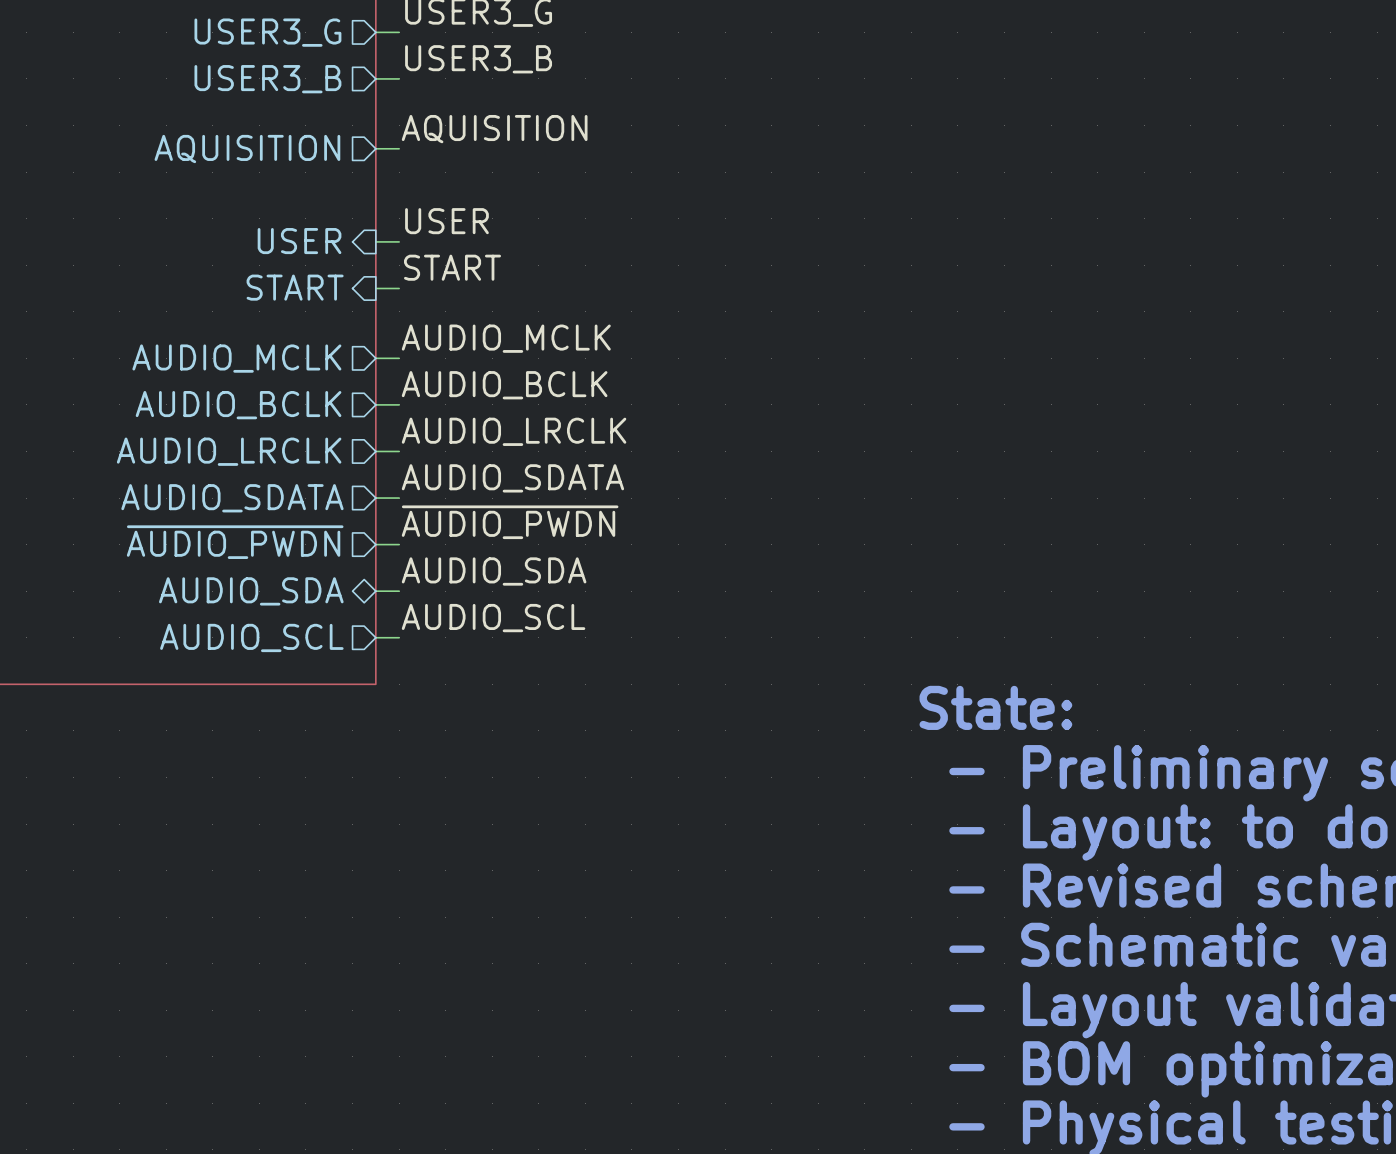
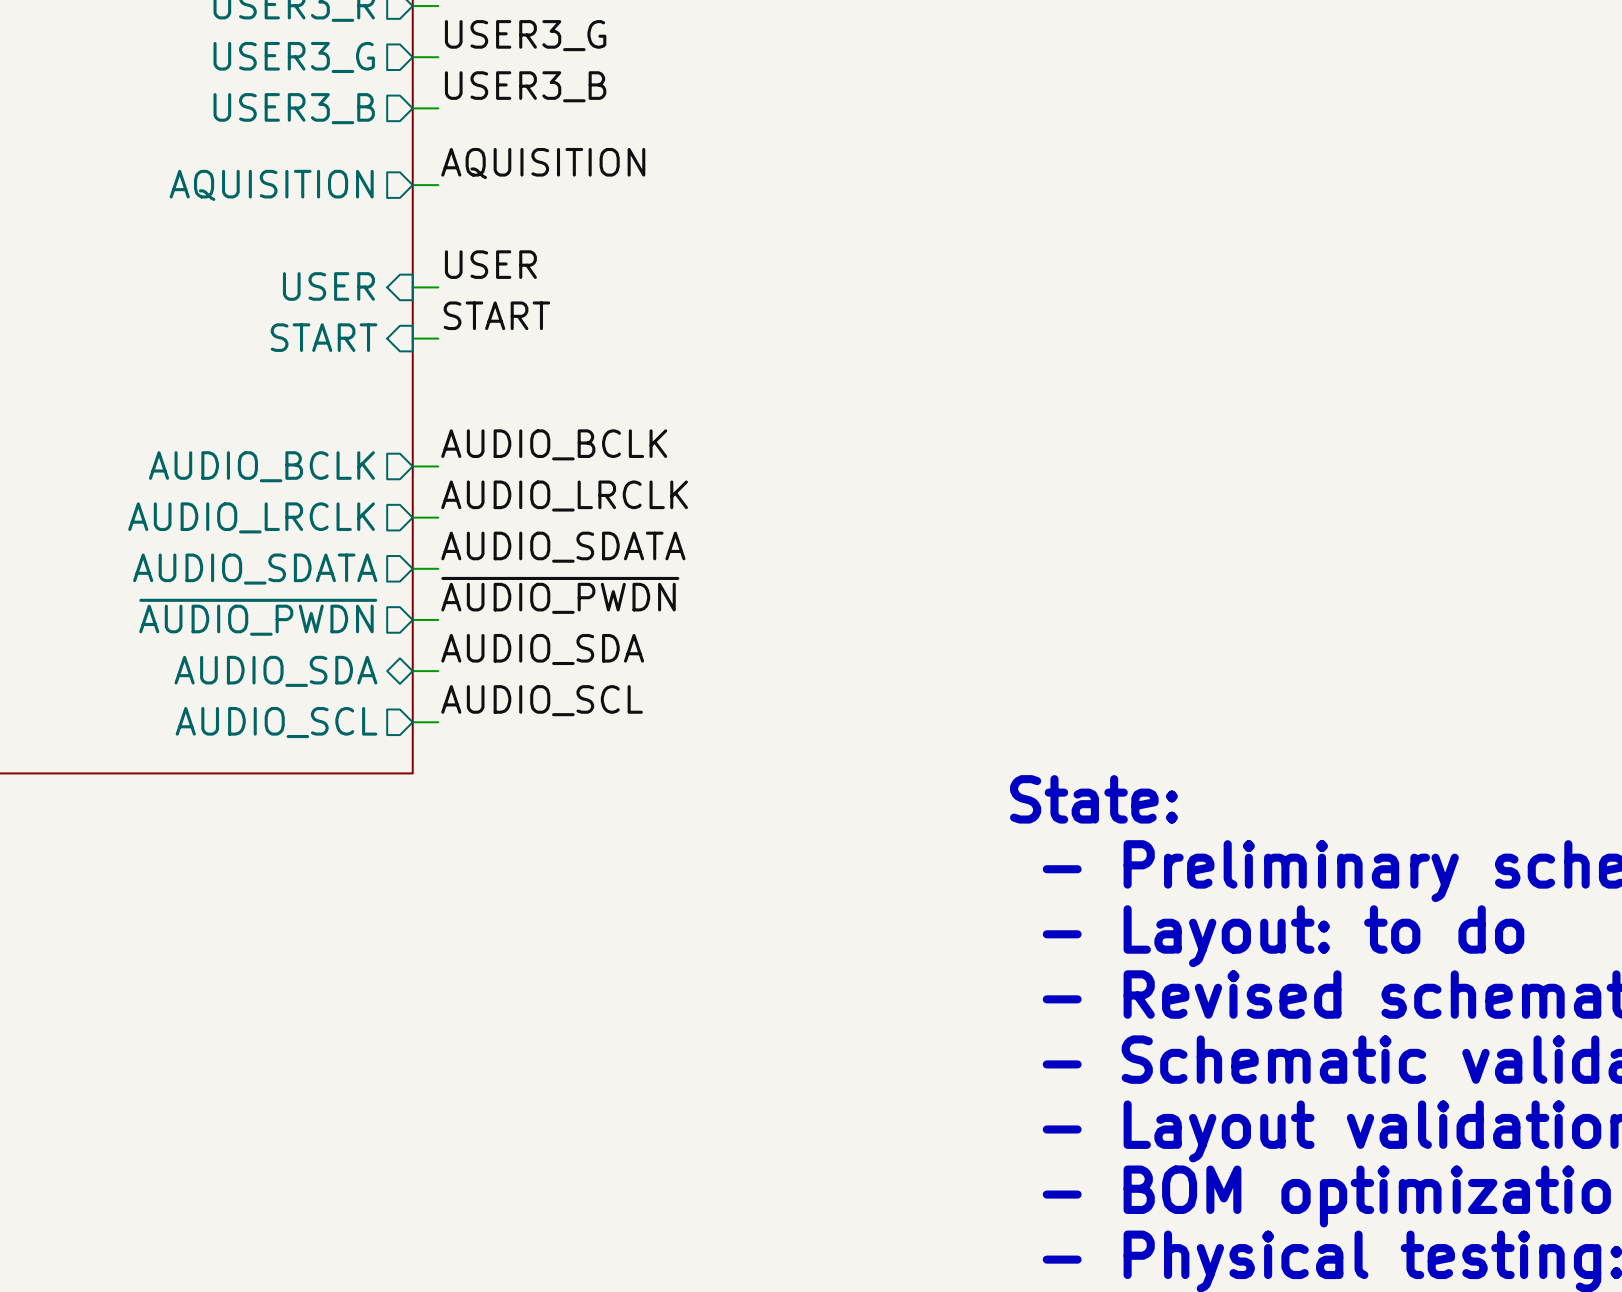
label: AUDIO_MCLK (506, 338) -> none
sheet pin: AUDIO_MCLK (236, 358) -> none
wire: (375, 358) (399, 358) -> none

